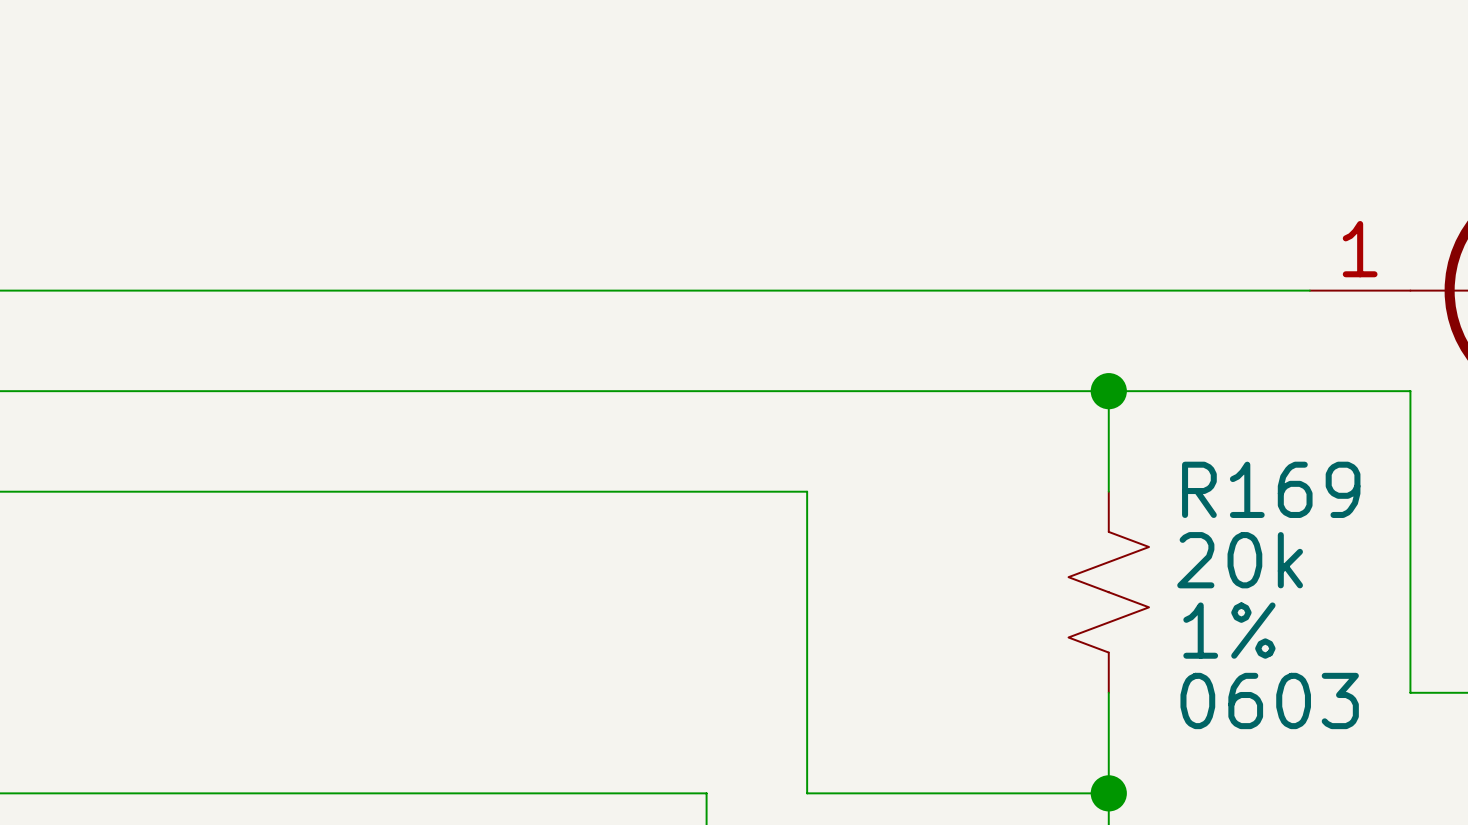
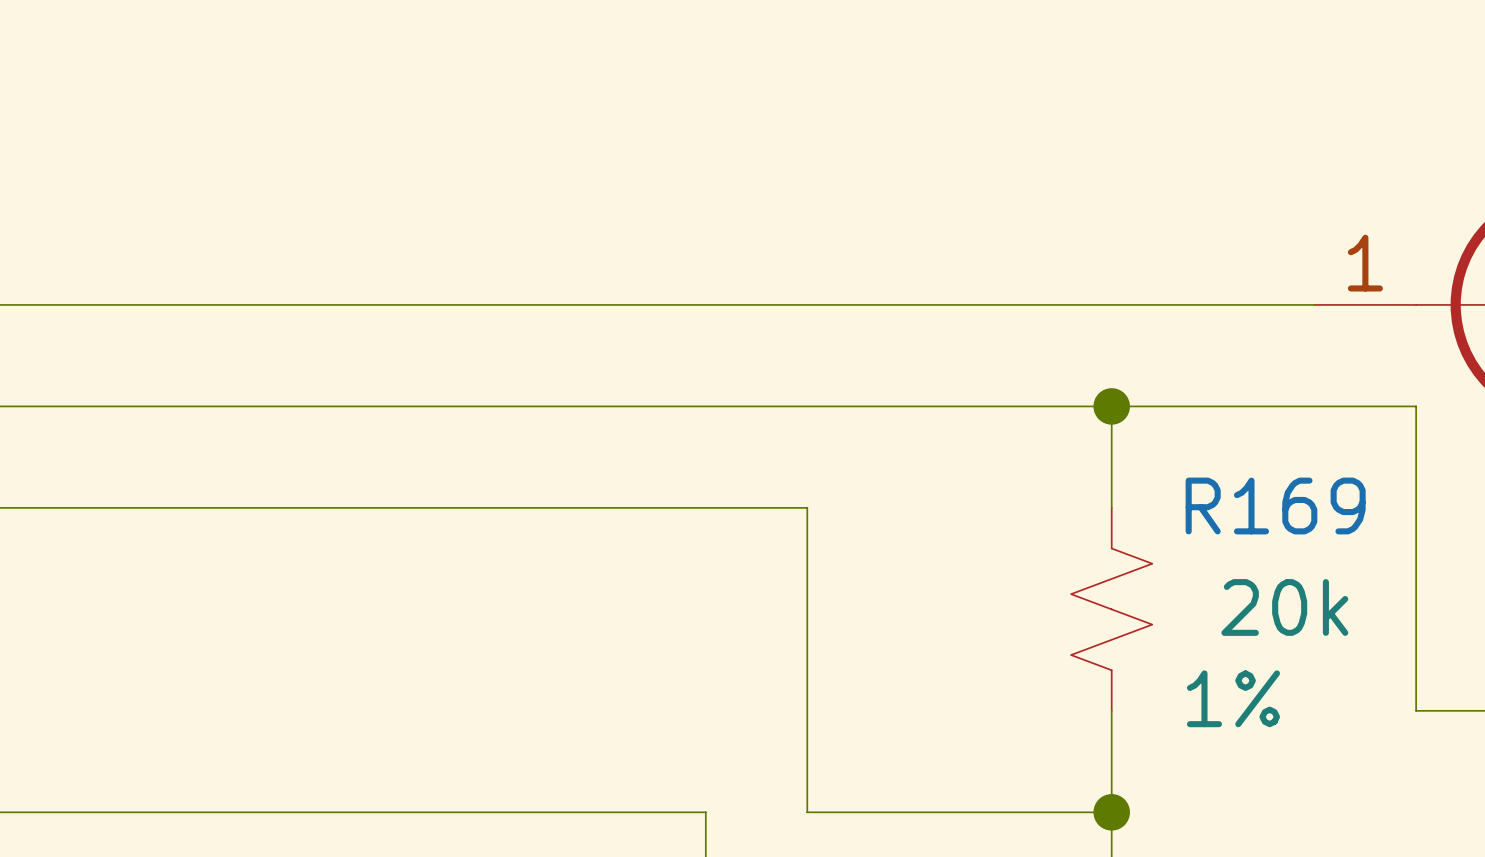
R169 value position: 20k (1240, 560) -> 20k (1284, 607)
R169 text position: 1% (1229, 630) -> 1% (1233, 698)
R169 text: 0603 (1269, 700) -> none

